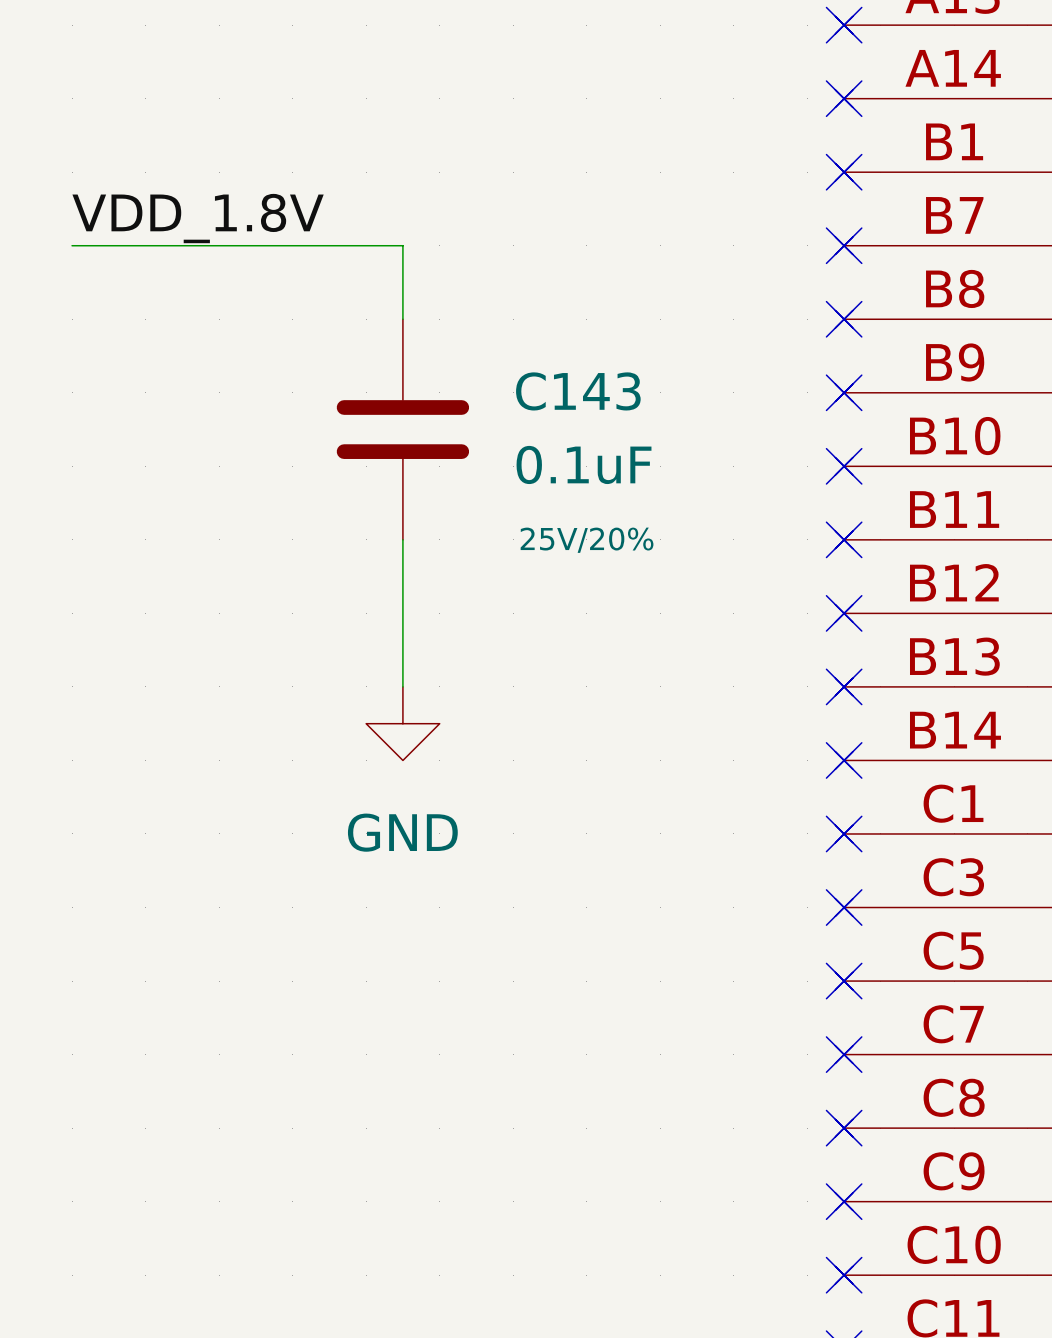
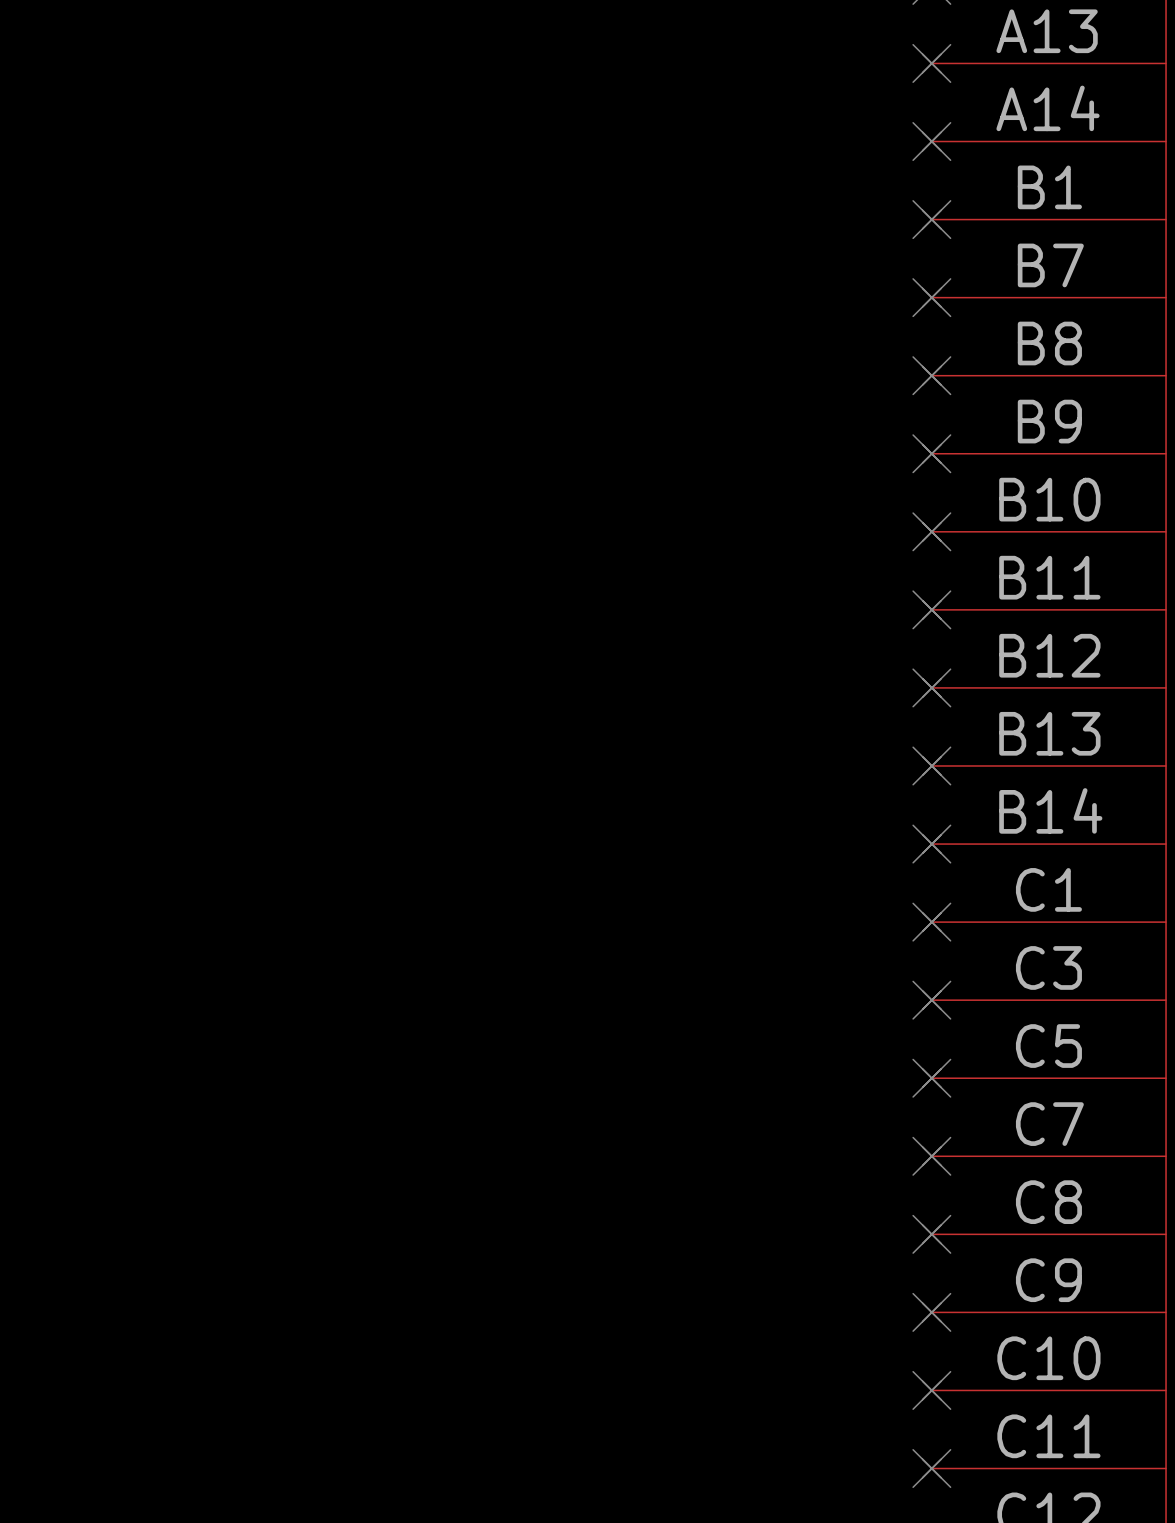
label: VDD_1.8V (198, 218) -> none
wire: (72, 245) (402, 245) (402, 319) -> none
C143: 0.1uF (402, 429) -> none
wire: (402, 539) (402, 686) -> none
power symbol: GND (402, 723) -> none

